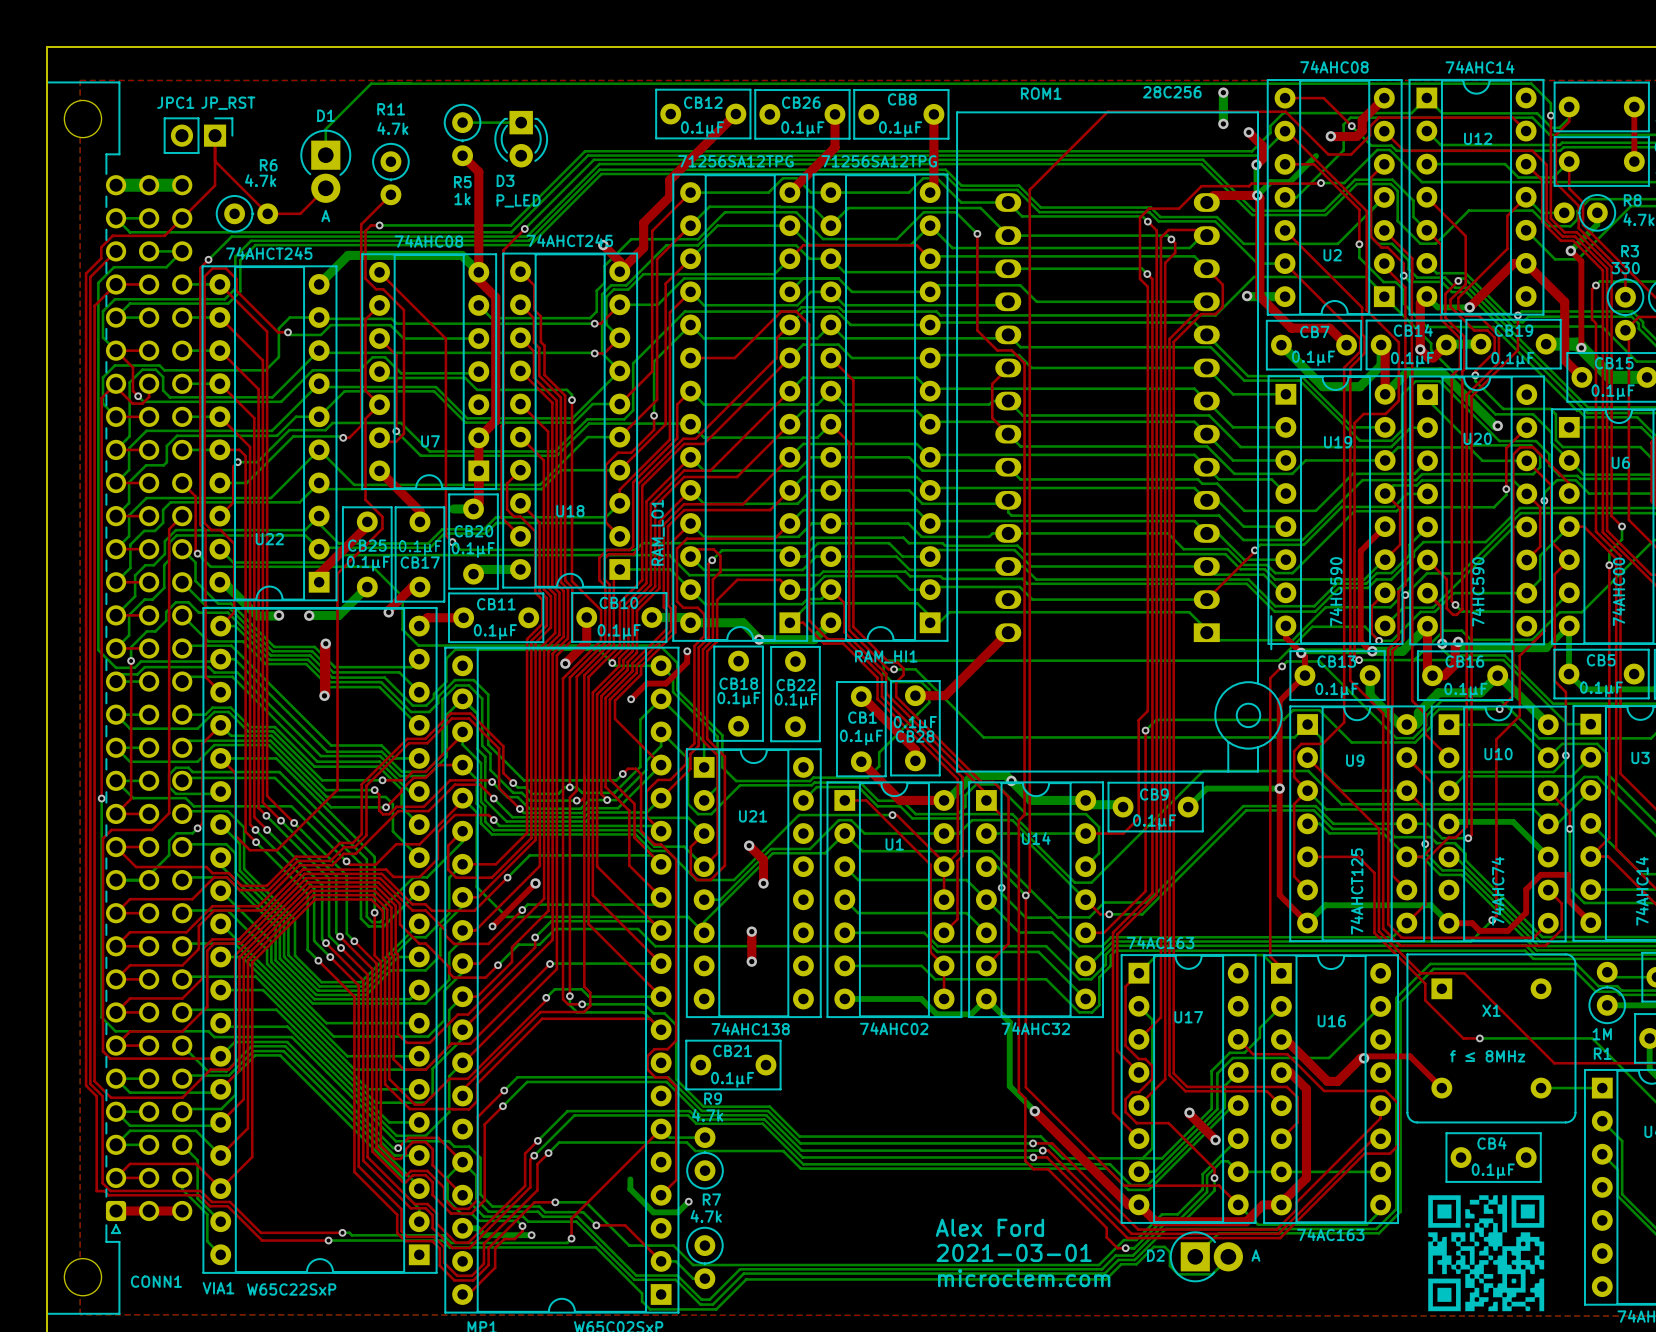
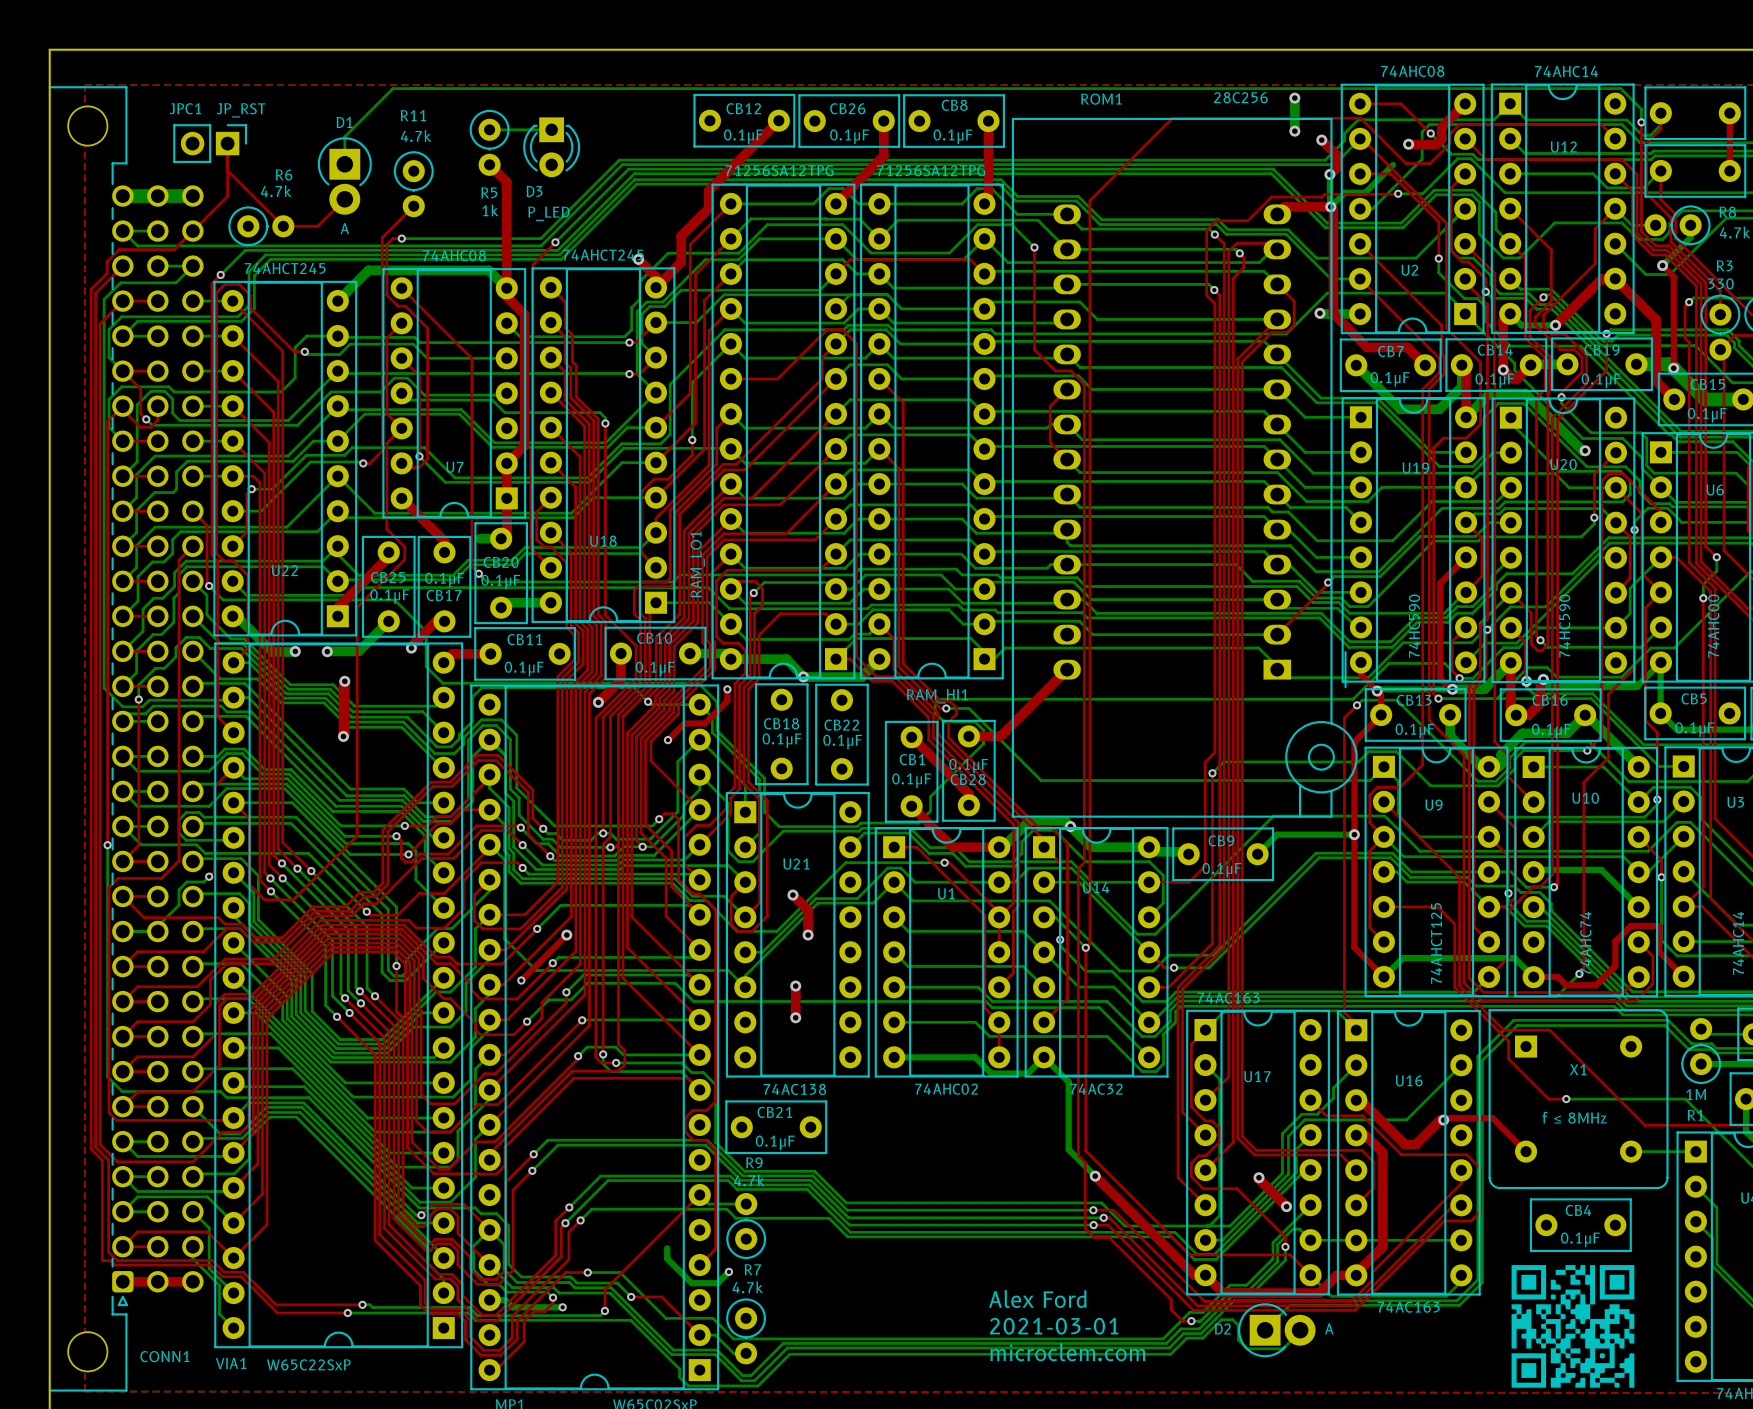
U21 value: 74AHC138 (750, 1028) -> 74AC138 (794, 1089)
U14 value: 74AHC32 (1035, 1028) -> 74AC32 (1096, 1089)

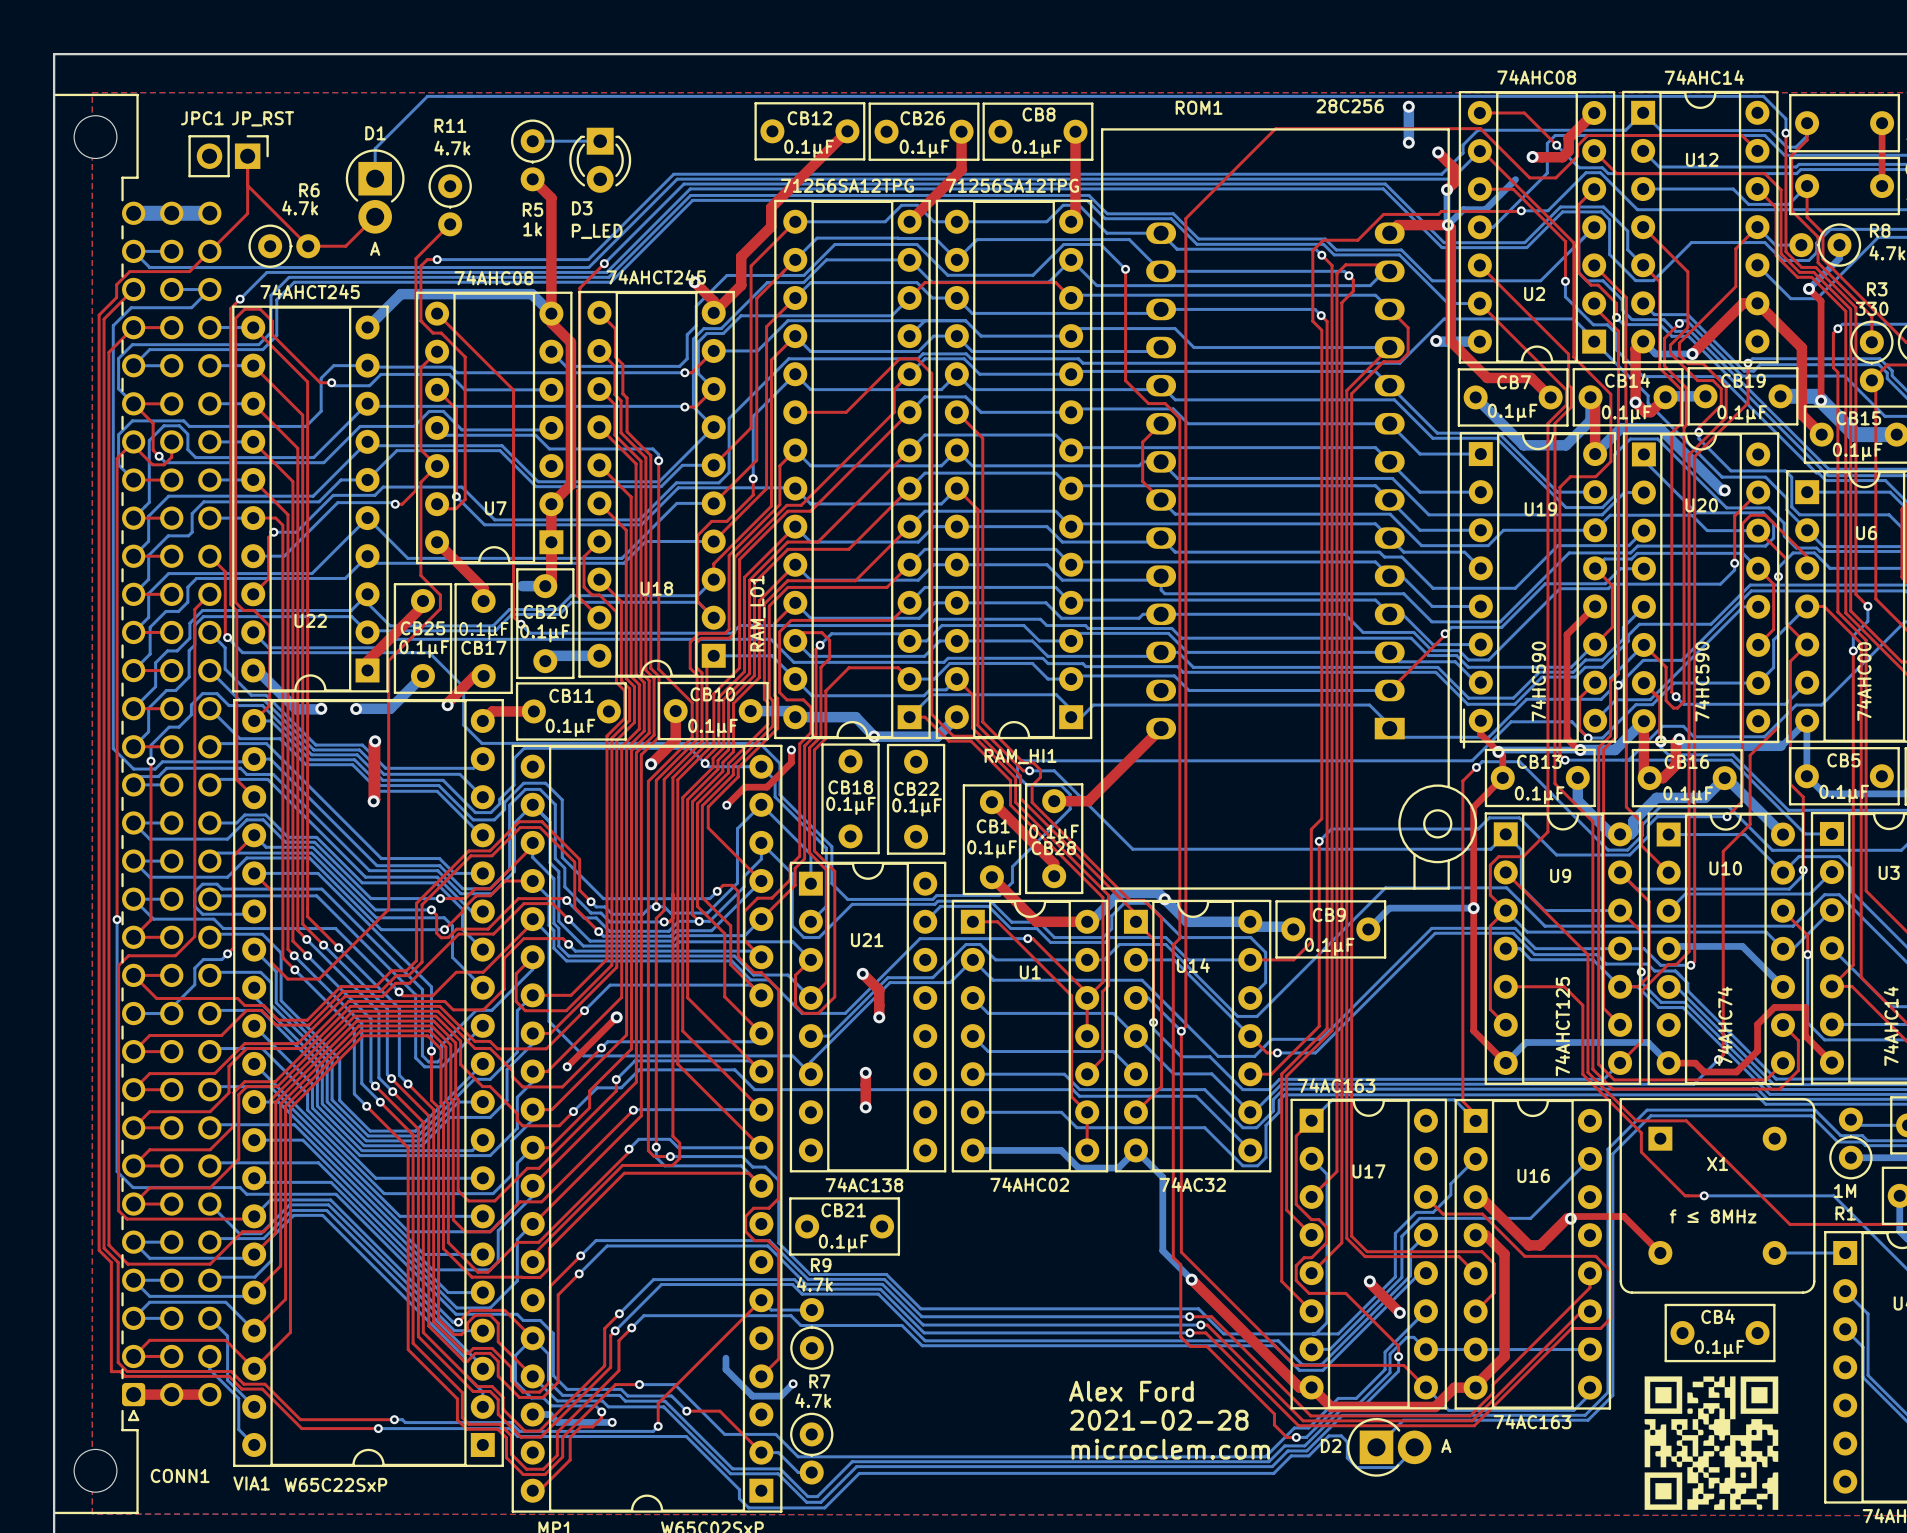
text: none -> Alex Ford (1131, 1391)
text: Alex Ford (1037, 1299) -> 2021-02-28 (1159, 1420)
text: 2021-03-01 (1054, 1326) -> microclem.com (1170, 1449)
text: microclem.com (1067, 1352) -> none

